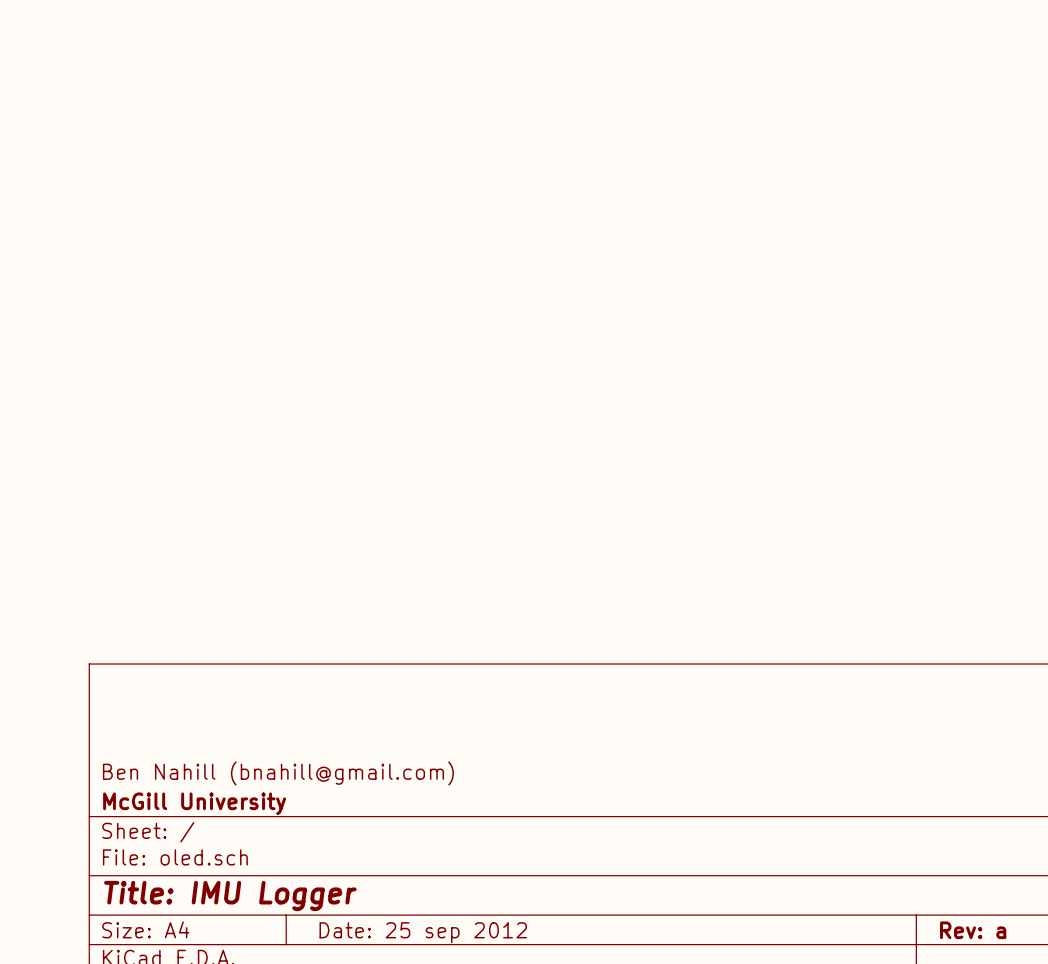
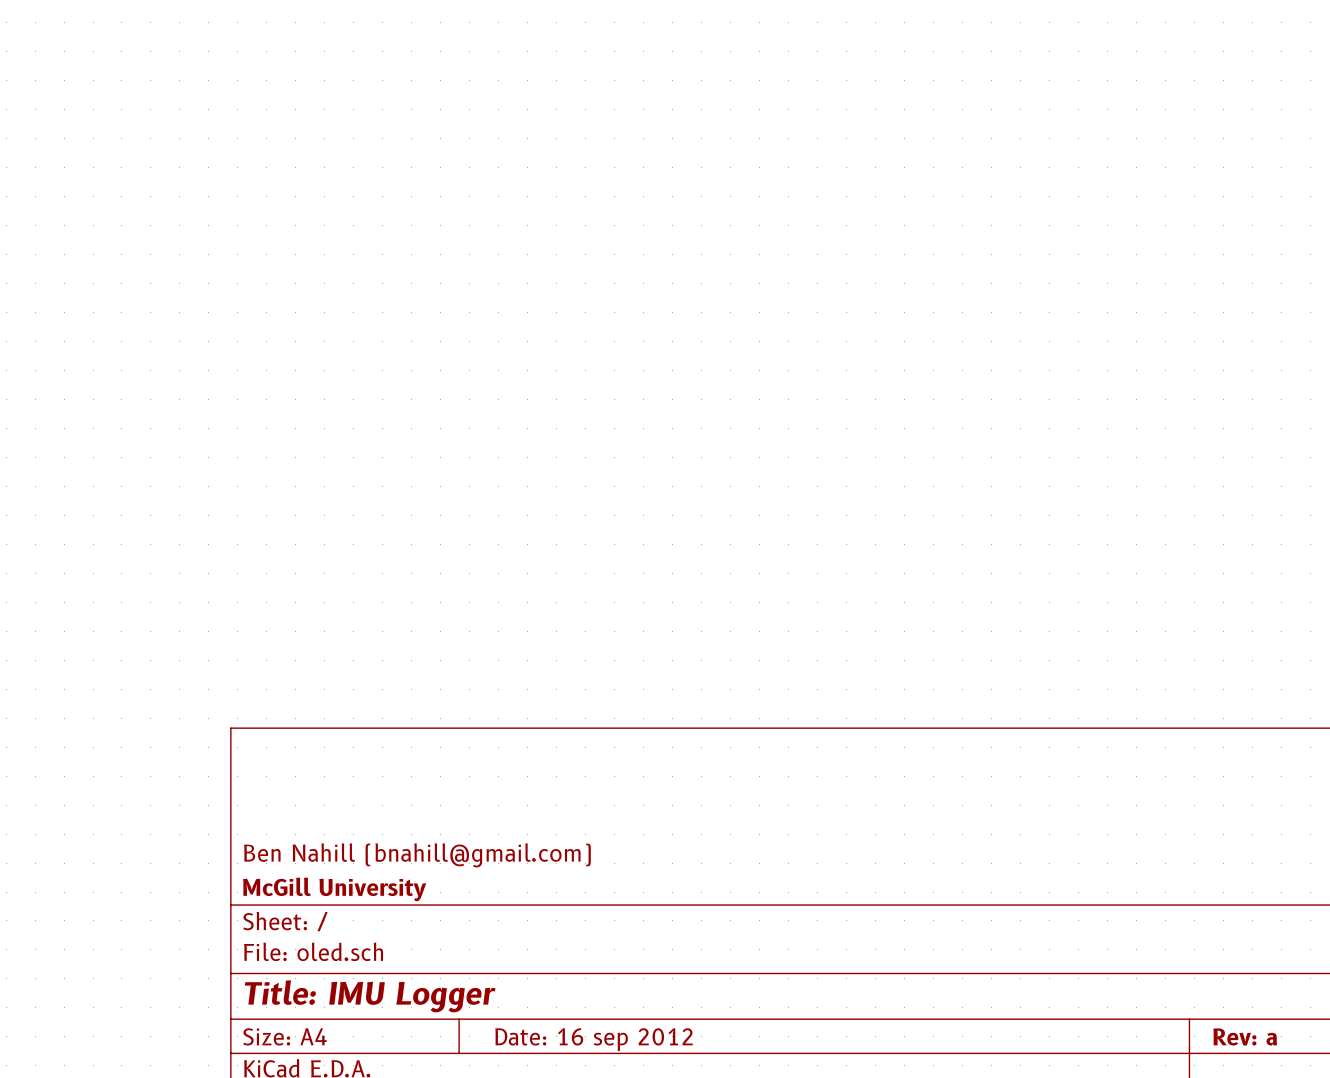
title block: Date: 25 sep 2012 (423, 932) -> Date: 16 sep 2012 (593, 1039)

